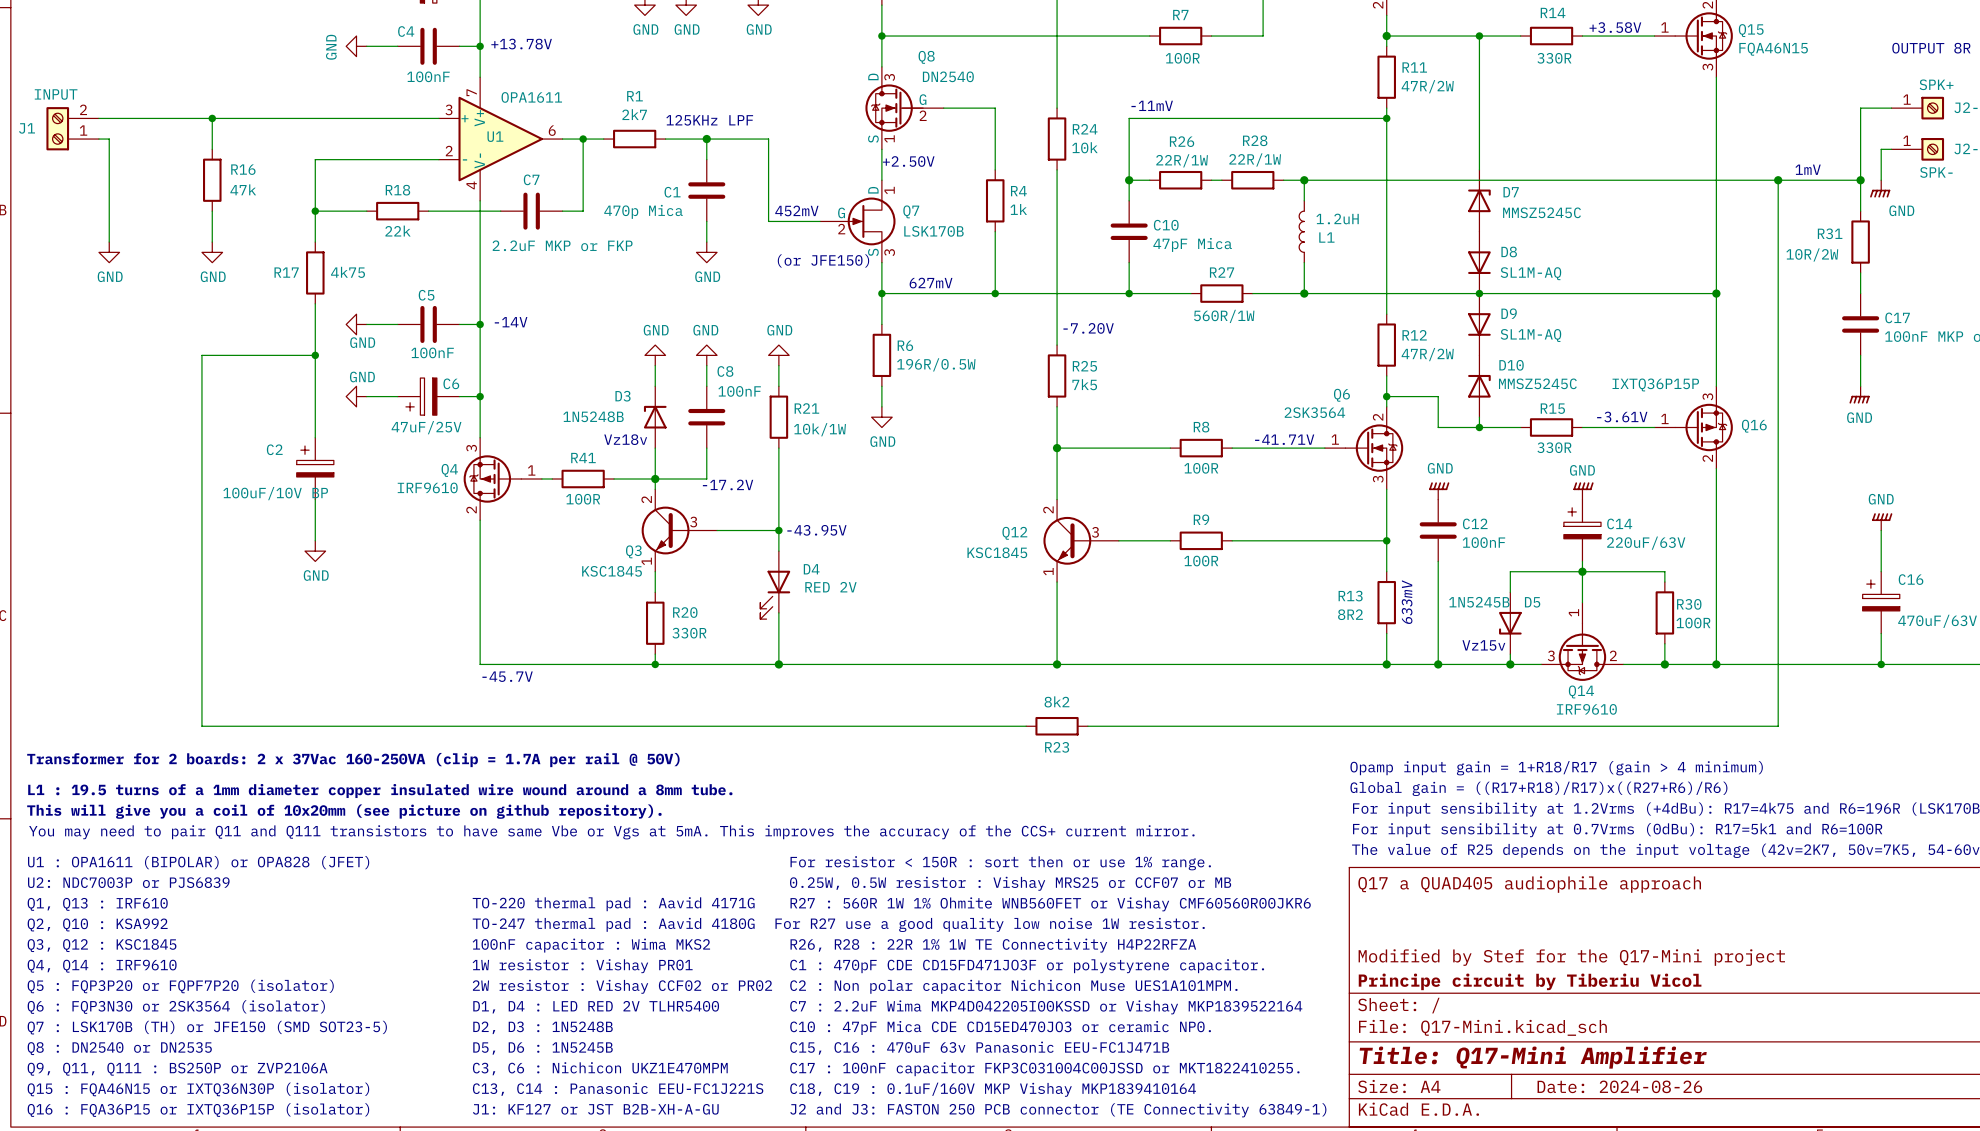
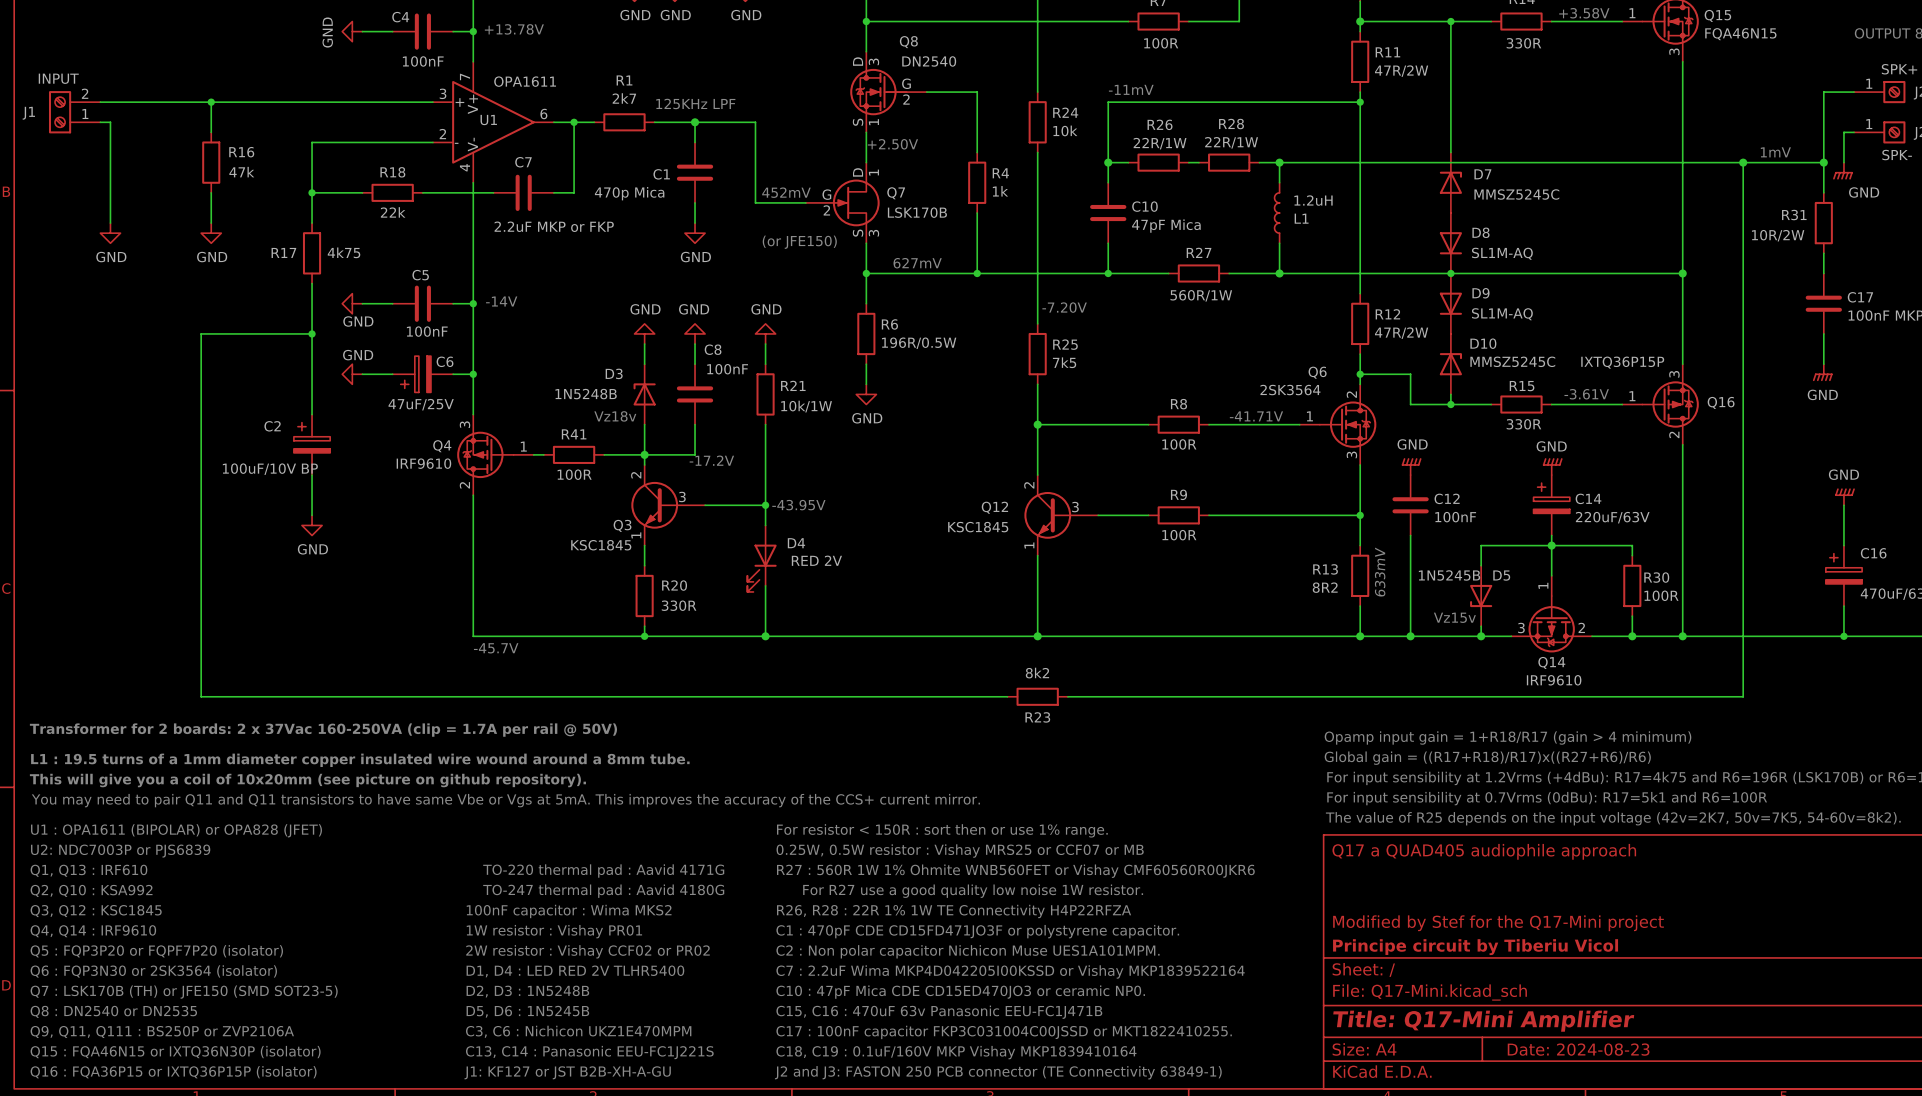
text: You may need to pair Q11 and Q111 transistors to have same Vbe or Vgs at 5mA. This improves the accuracy of the CCS+ current mirror. (611, 832) -> You may need to pair Q11 and Q11 transistors to have same Vbe or Vgs at 5mA. This improves the accuracy of the CCS+ current mirror. (505, 800)
title block: Date: 2024-08-26 (1619, 1086) -> Date: 2024-08-23 (1578, 1049)

